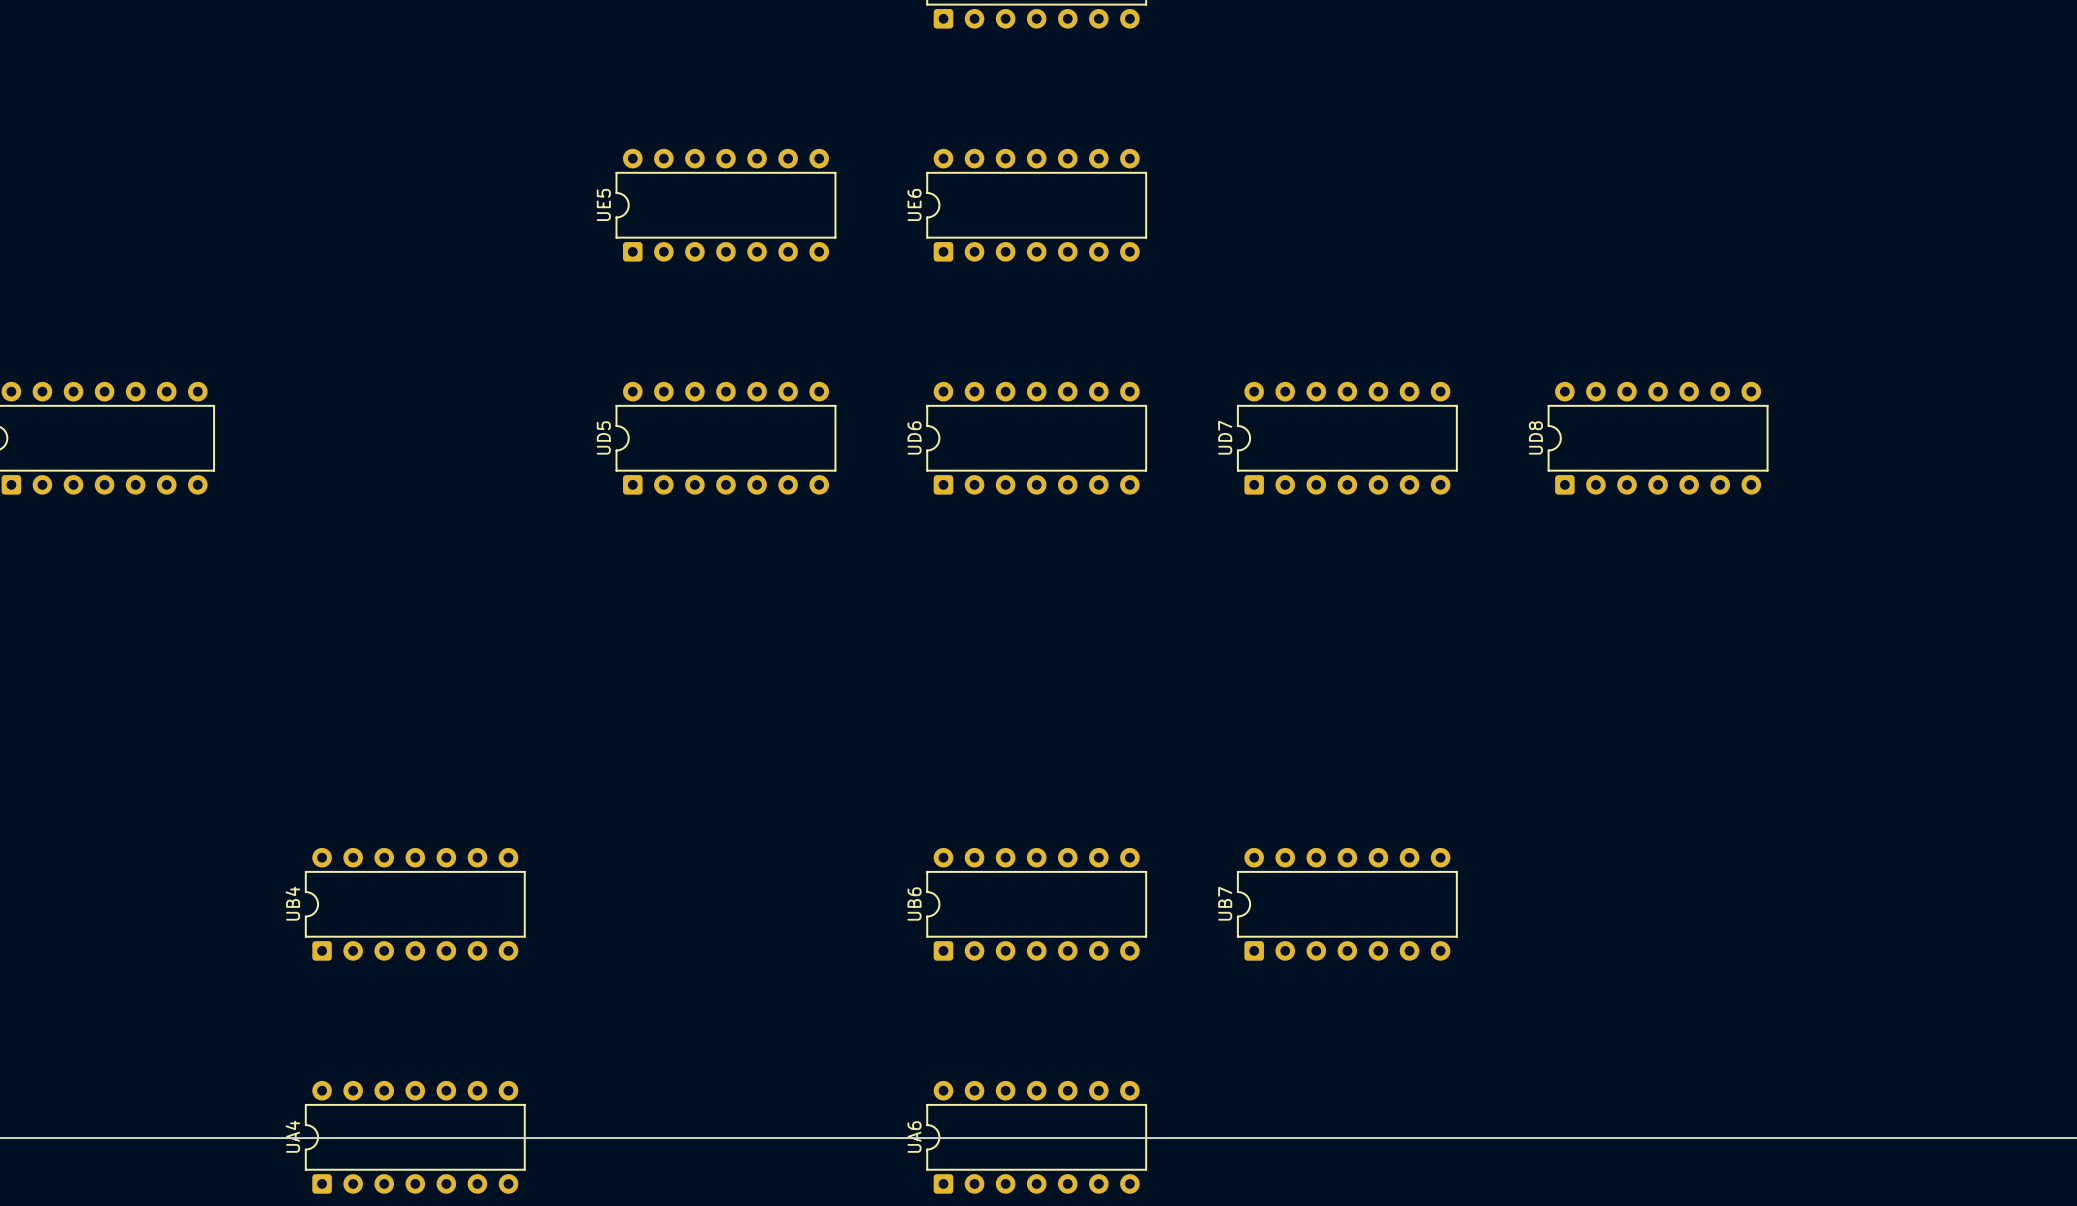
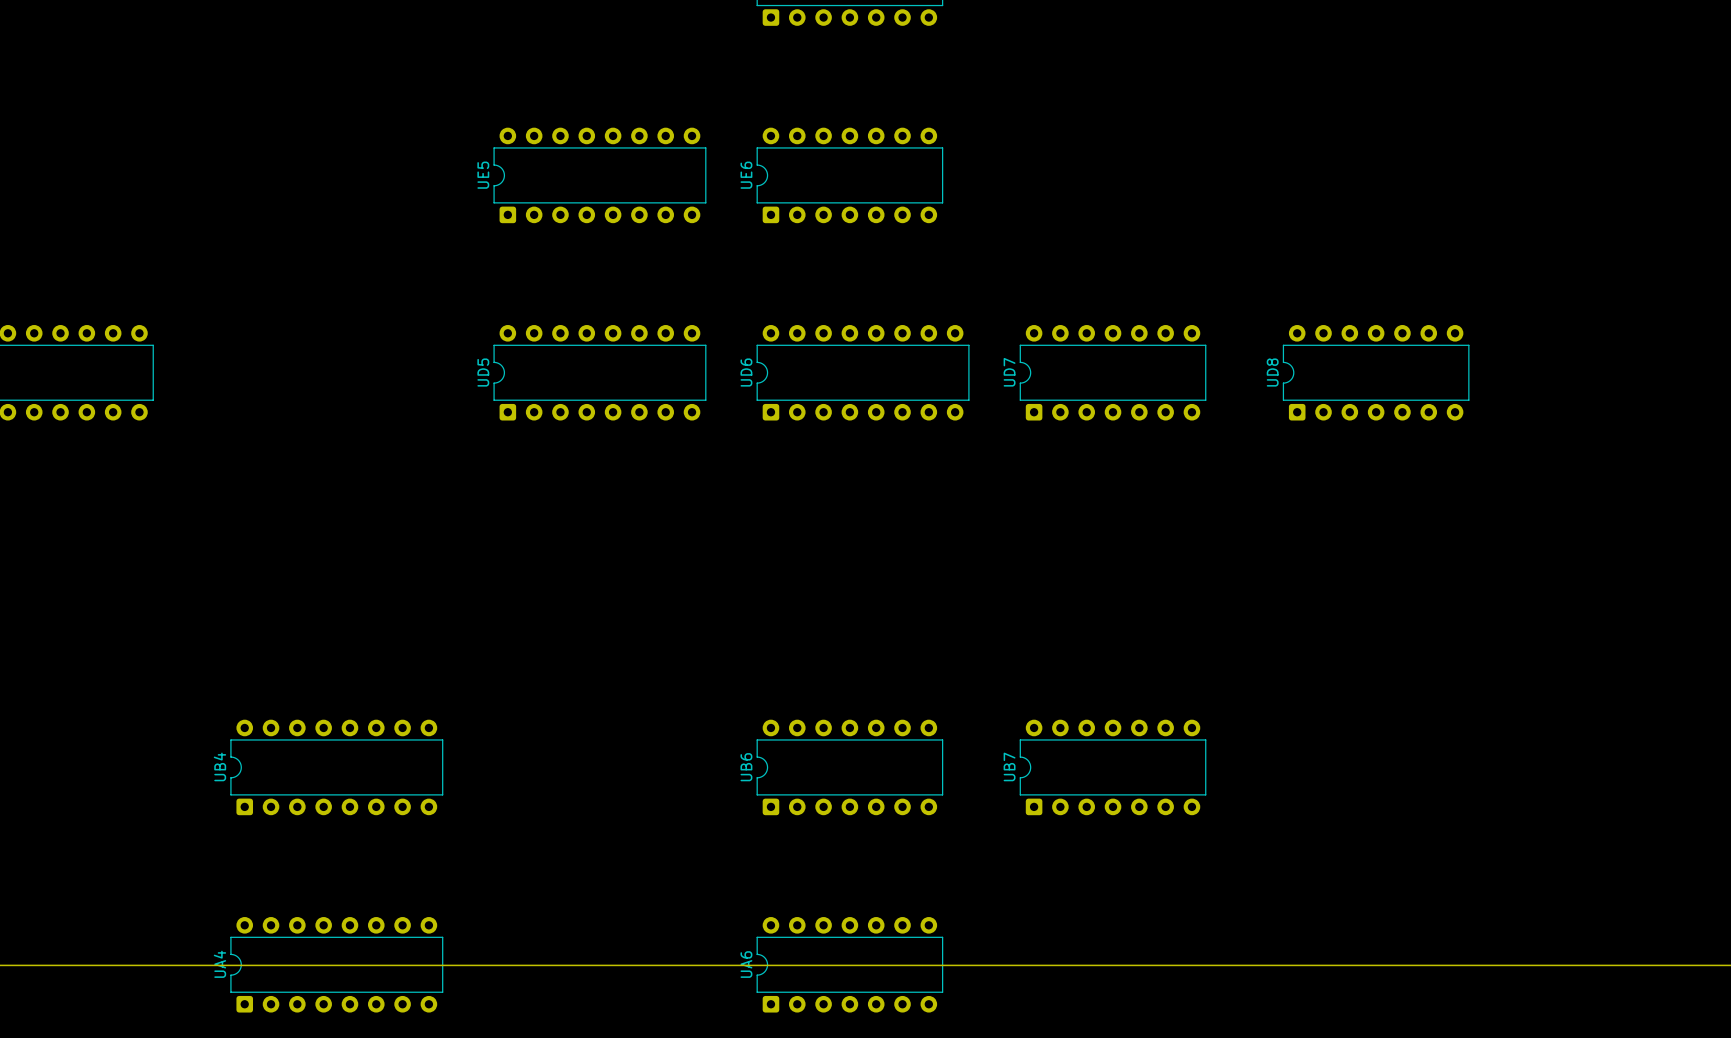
UE5 footprint: [615, 148, 837, 262] -> [493, 127, 707, 224]
UD5 footprint: [615, 381, 837, 495] -> [493, 325, 707, 421]
UD6 footprint: [926, 381, 1147, 495] -> [756, 325, 970, 421]
UB4 footprint: [305, 847, 526, 961] -> [230, 719, 444, 816]
UA4 footprint: [305, 1080, 526, 1194] -> [230, 917, 444, 1013]

